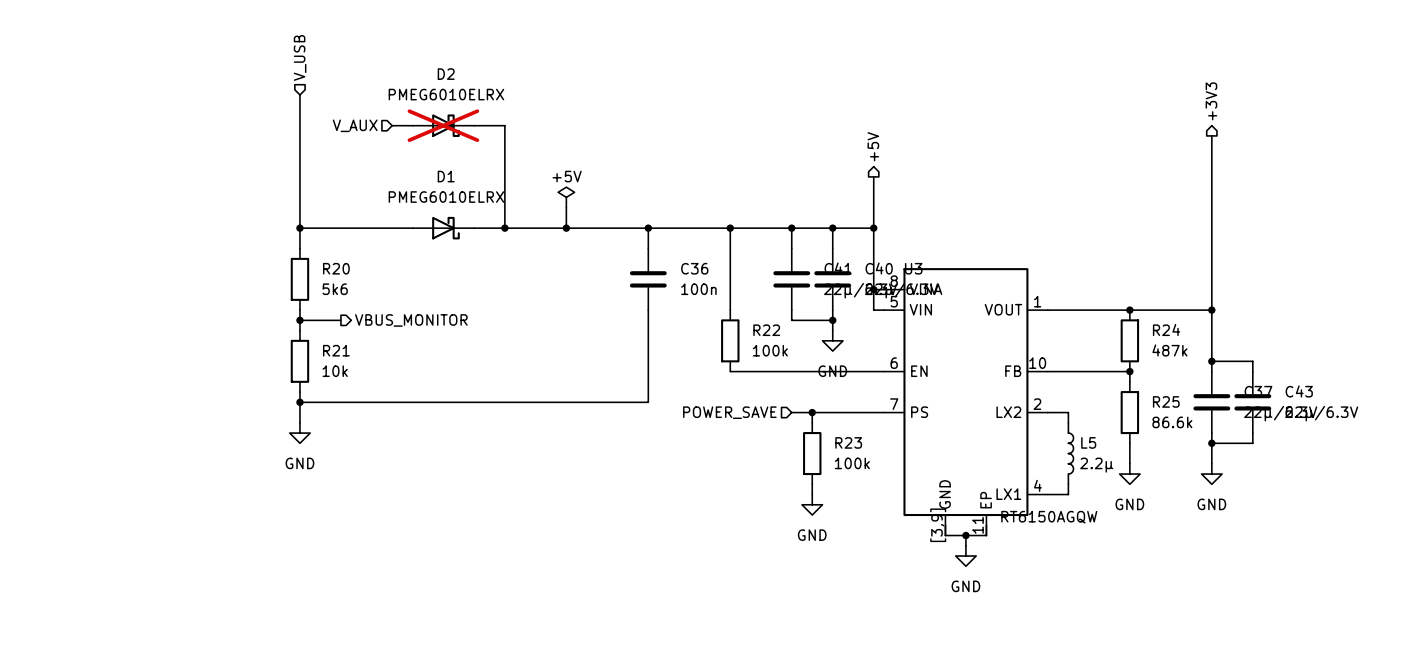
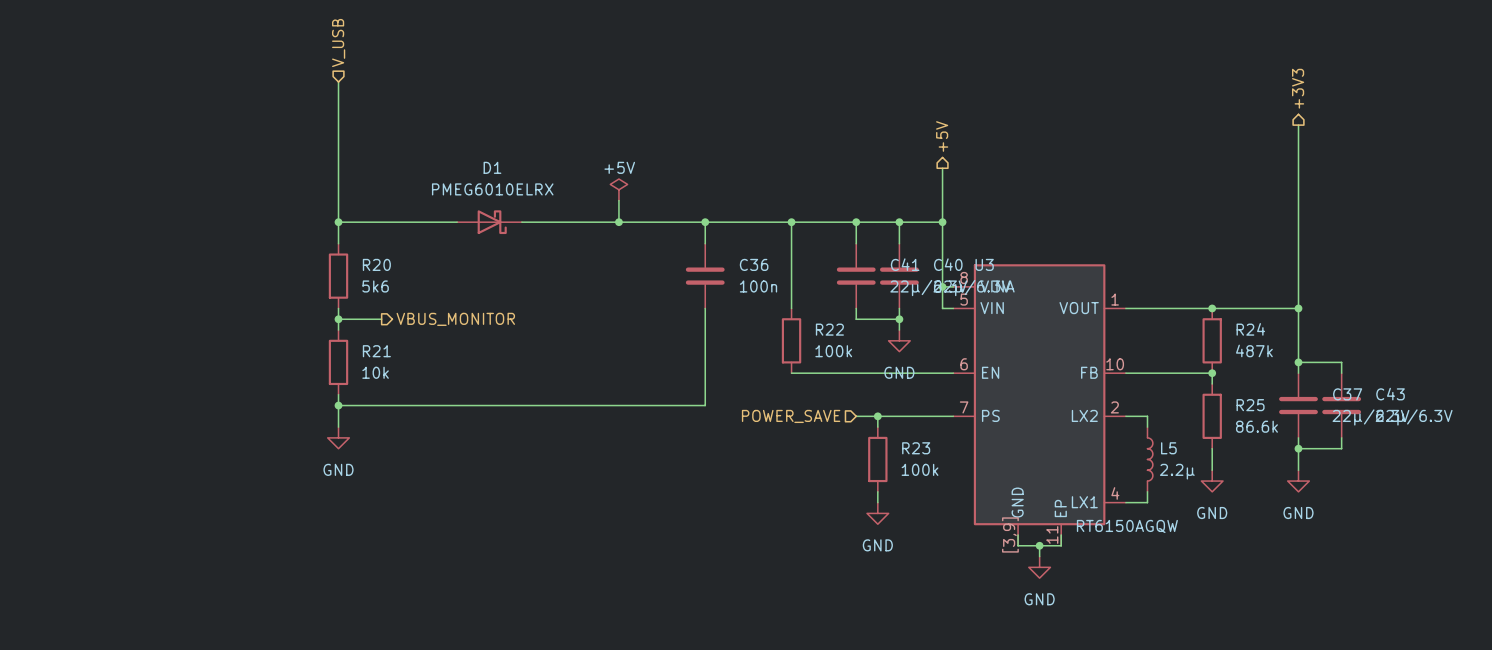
hierarchical label: V_AUX (355, 125) -> none
wire: (392, 125) (412, 125) -> none
D2: PMEG6010ELRX (443, 125) -> none
wire: (474, 125) (504, 125) (504, 228) -> none
junction: (504, 228) -> none

